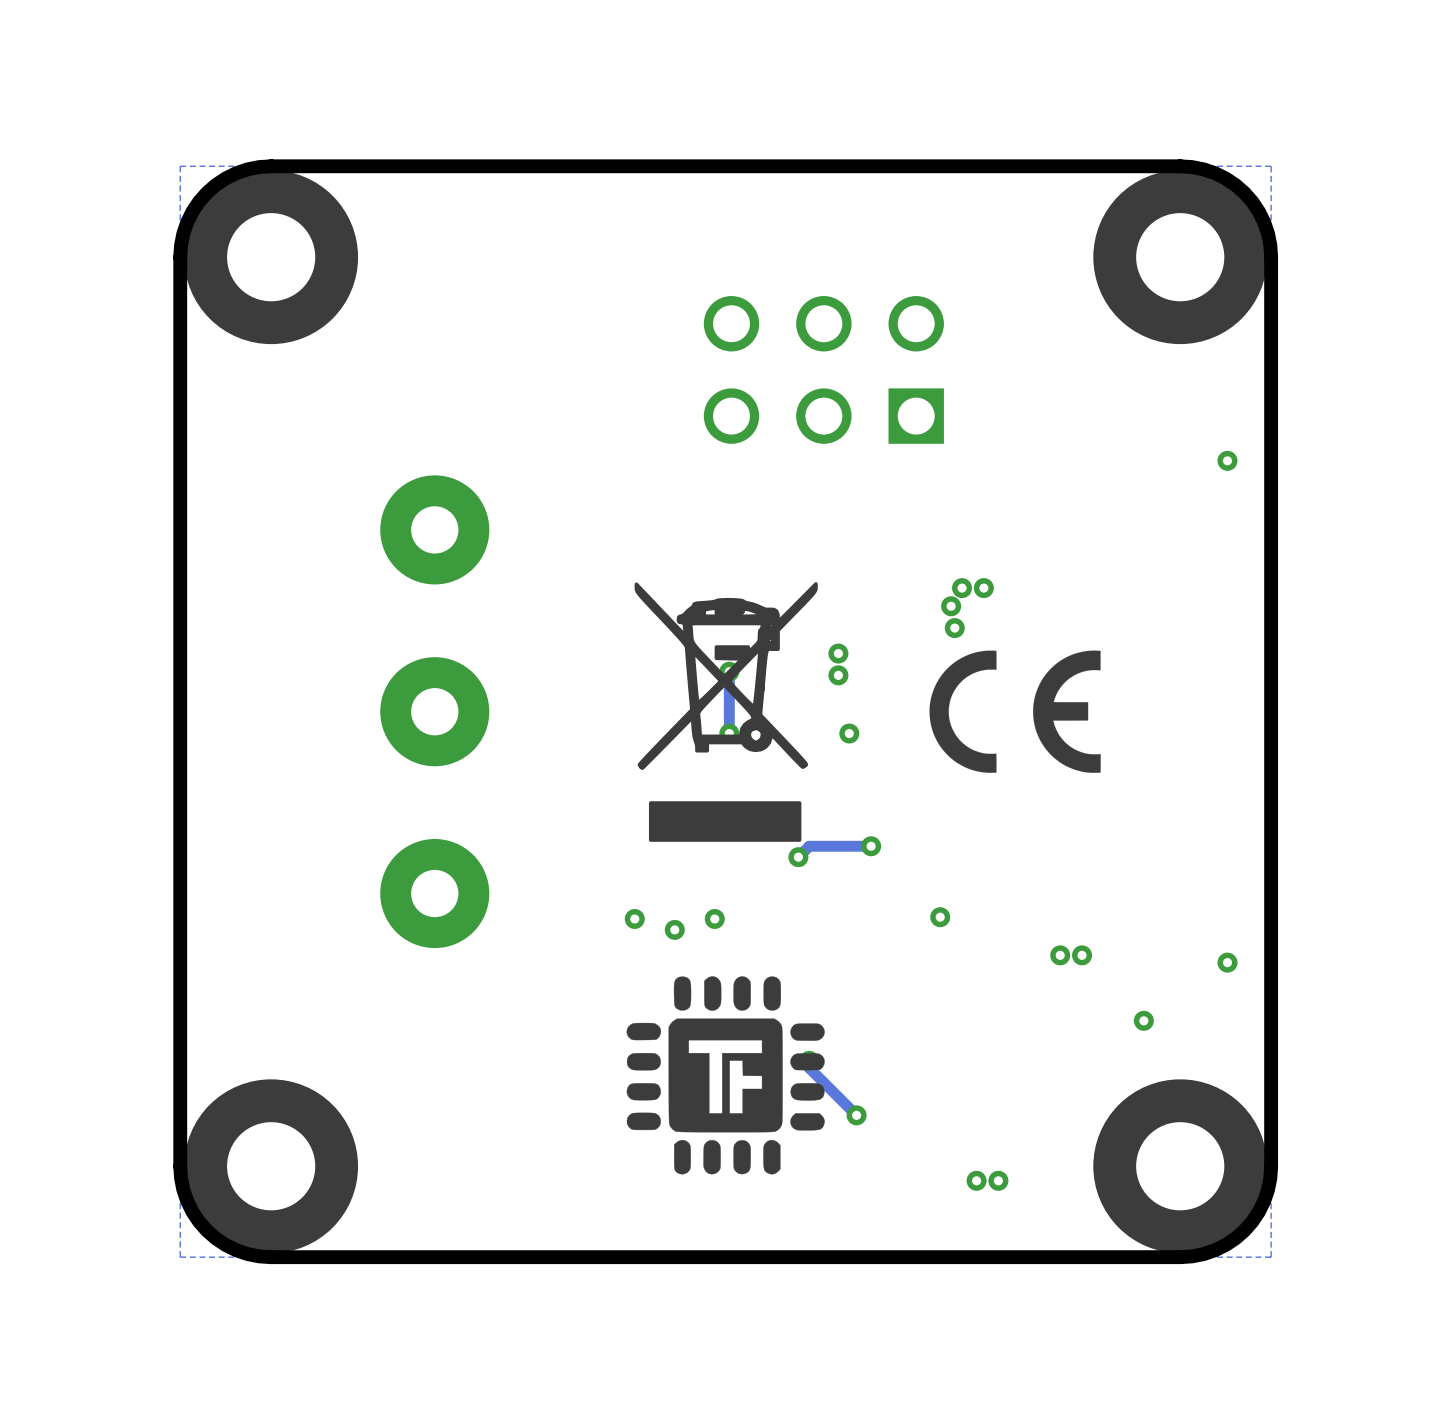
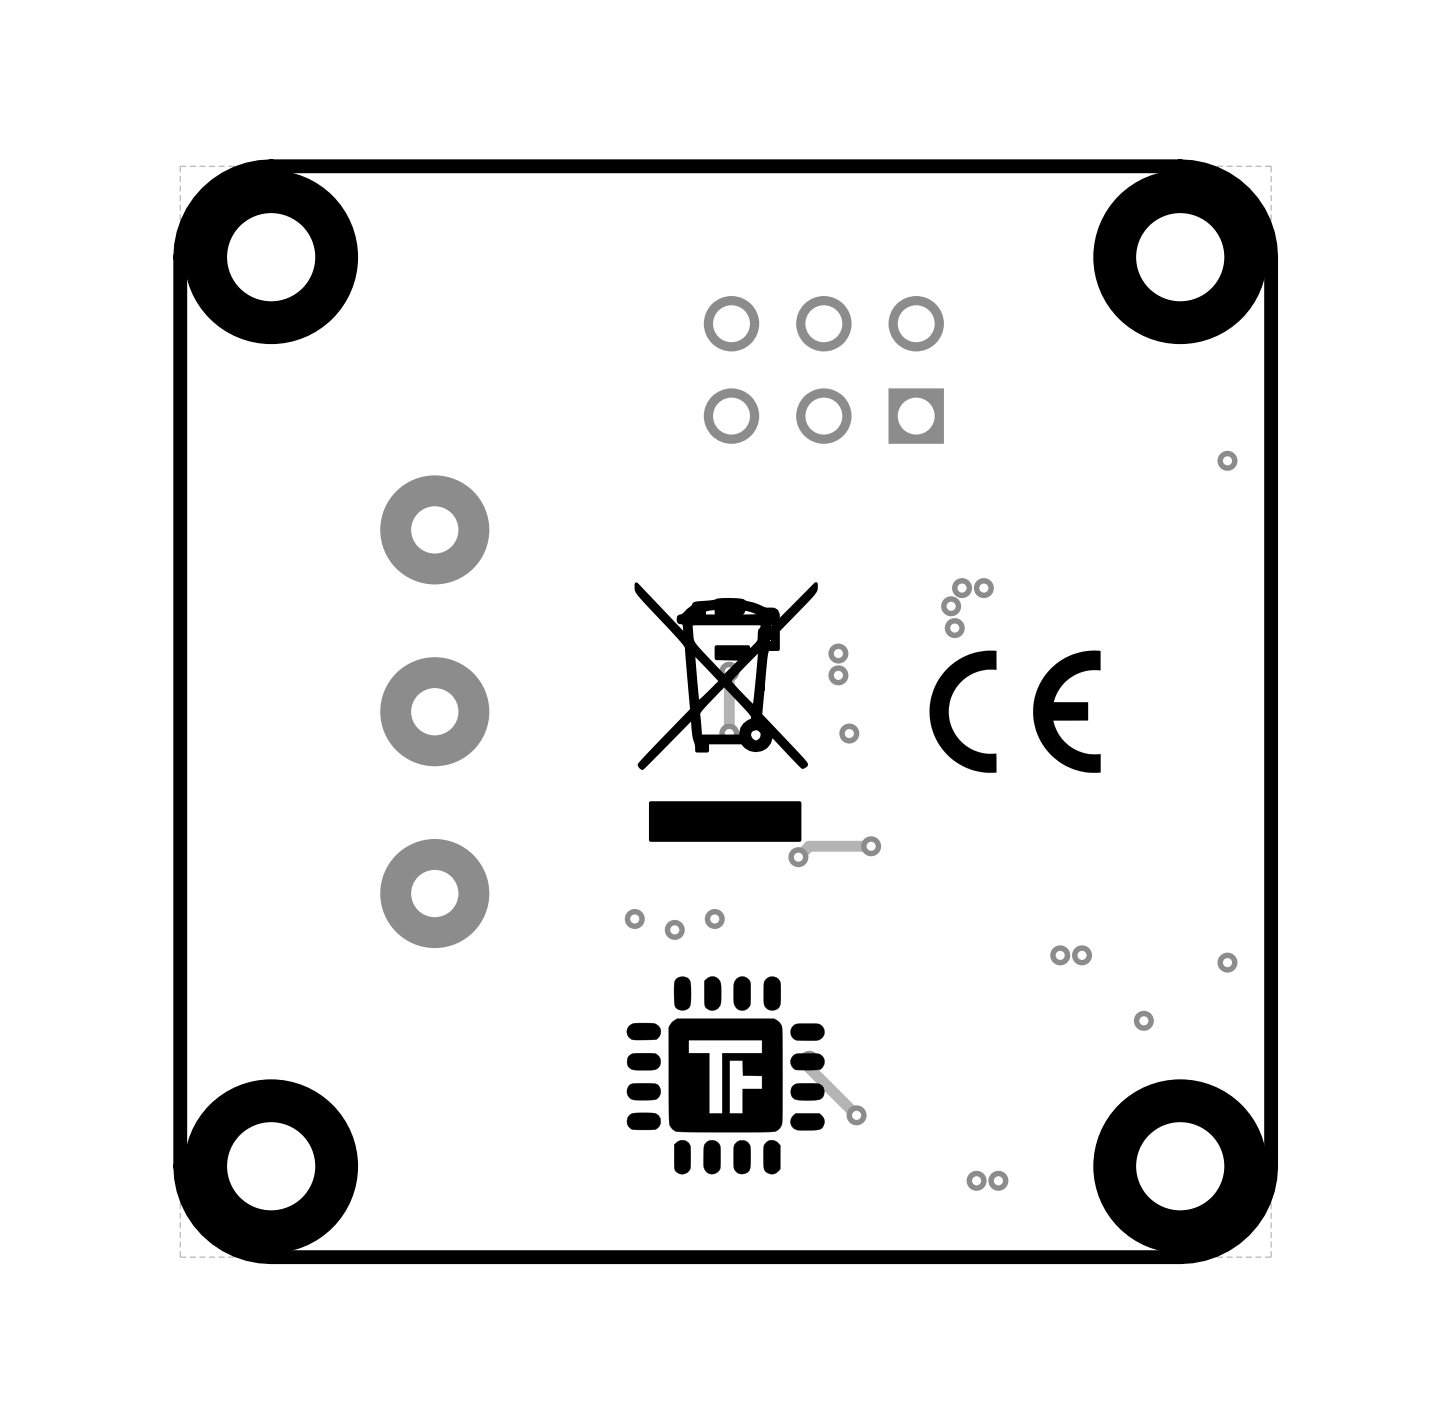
via: (940, 917) -> none

